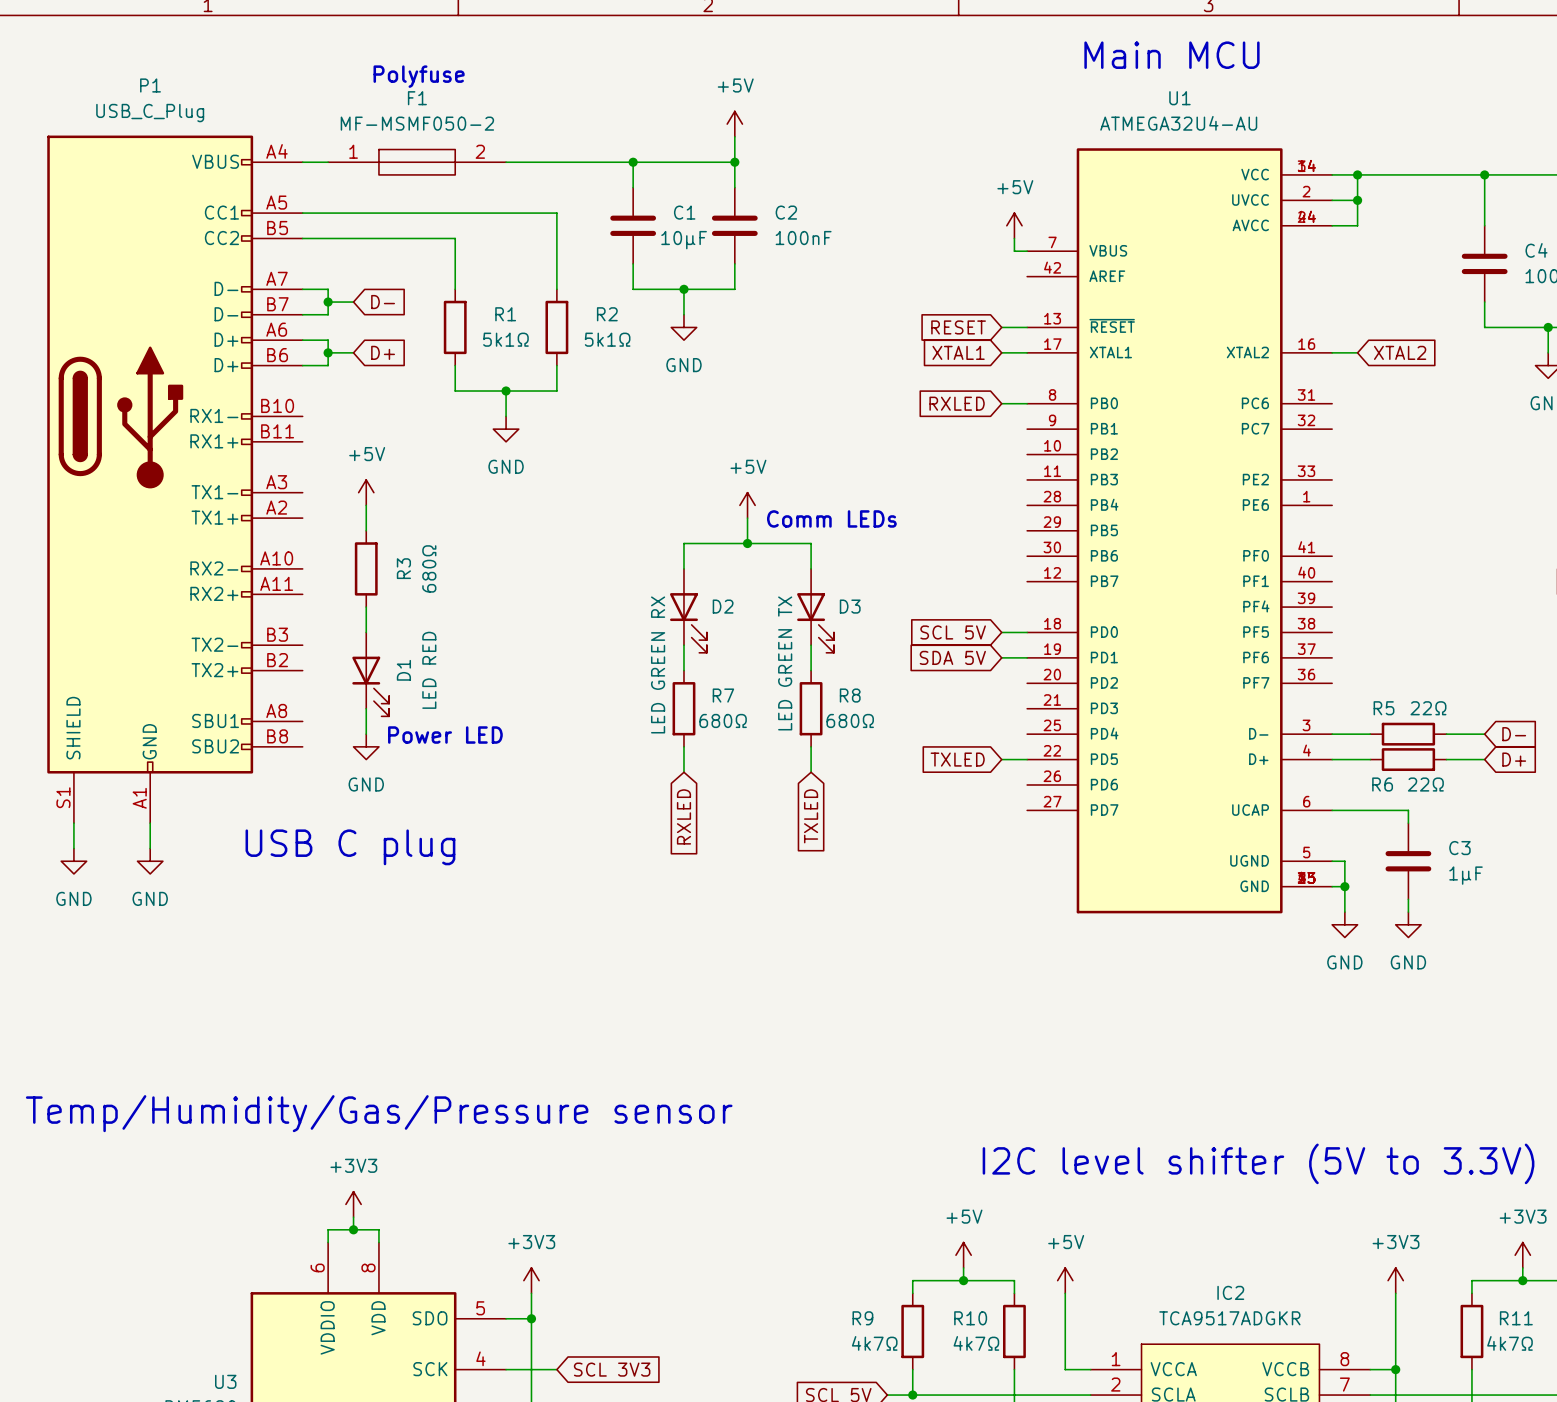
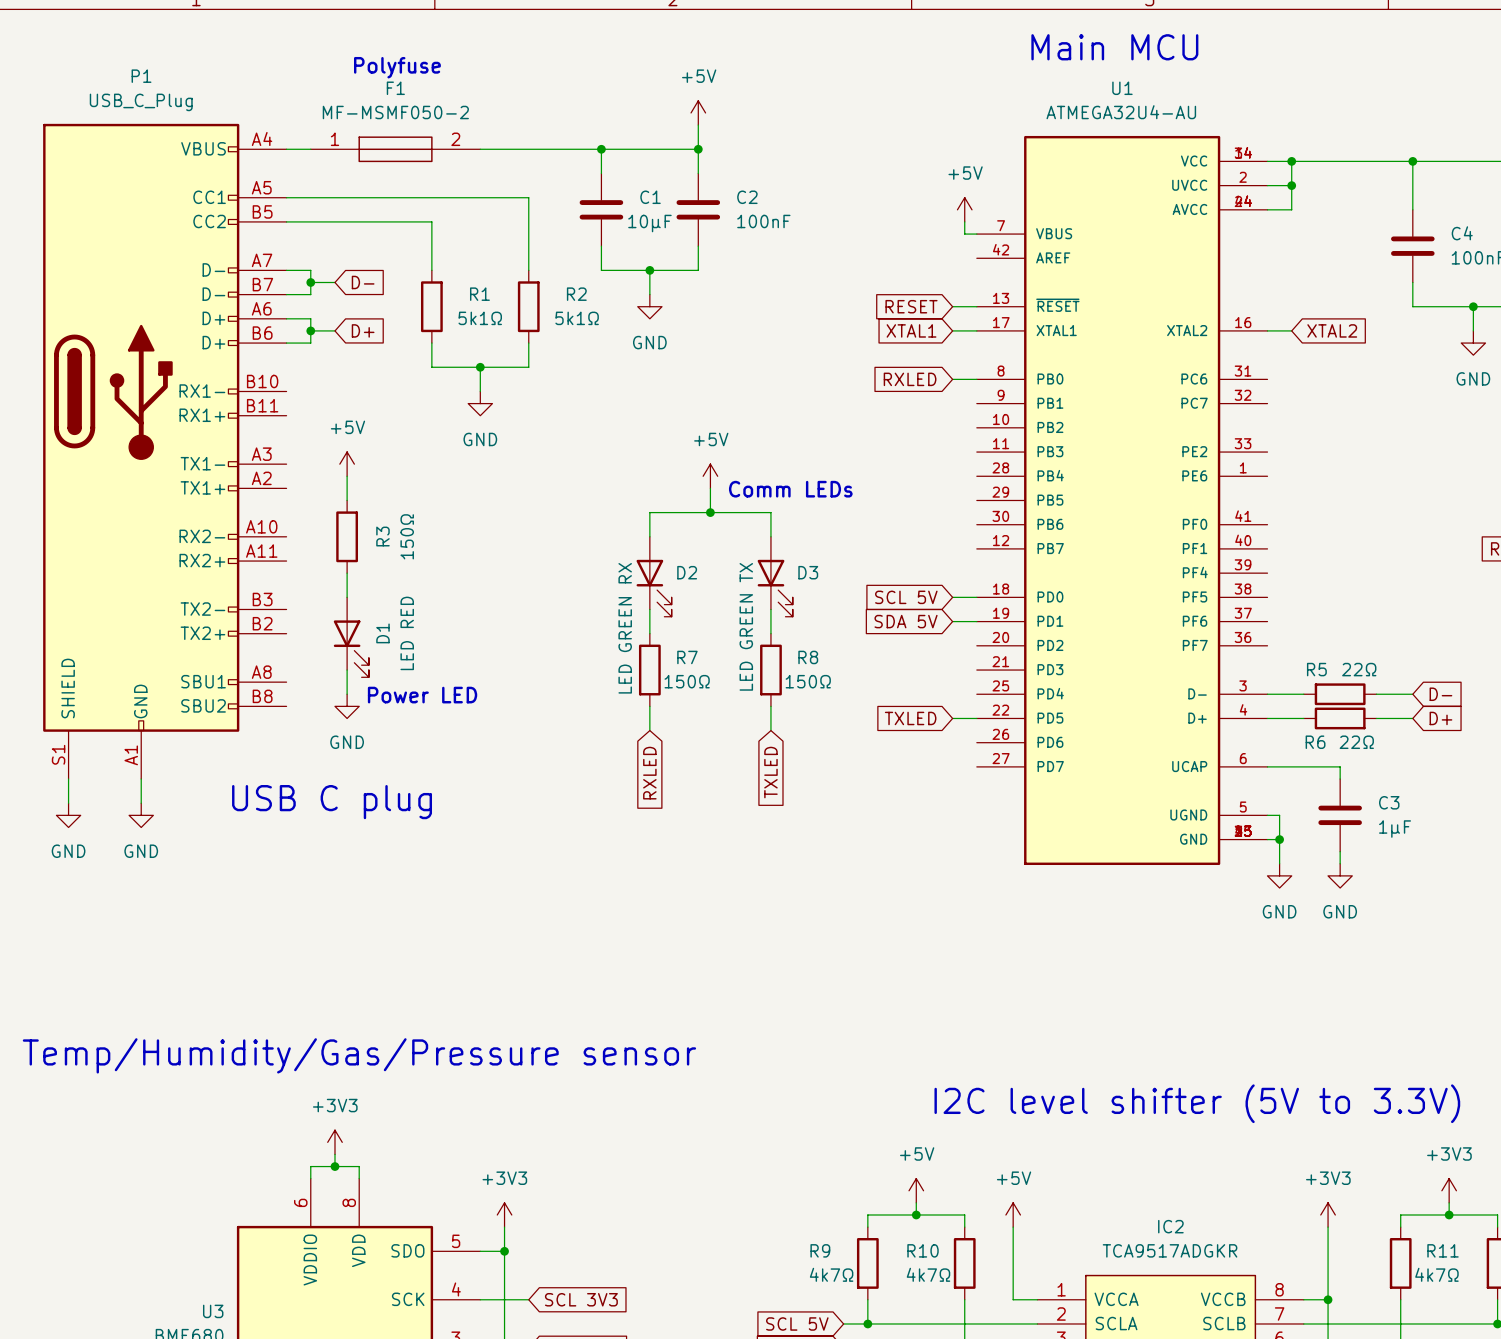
R3 value: 680Ω (429, 568) -> 150Ω (407, 536)
R7 value: 680Ω (723, 720) -> 150Ω (687, 681)
R8 value: 680Ω (850, 720) -> 150Ω (808, 681)

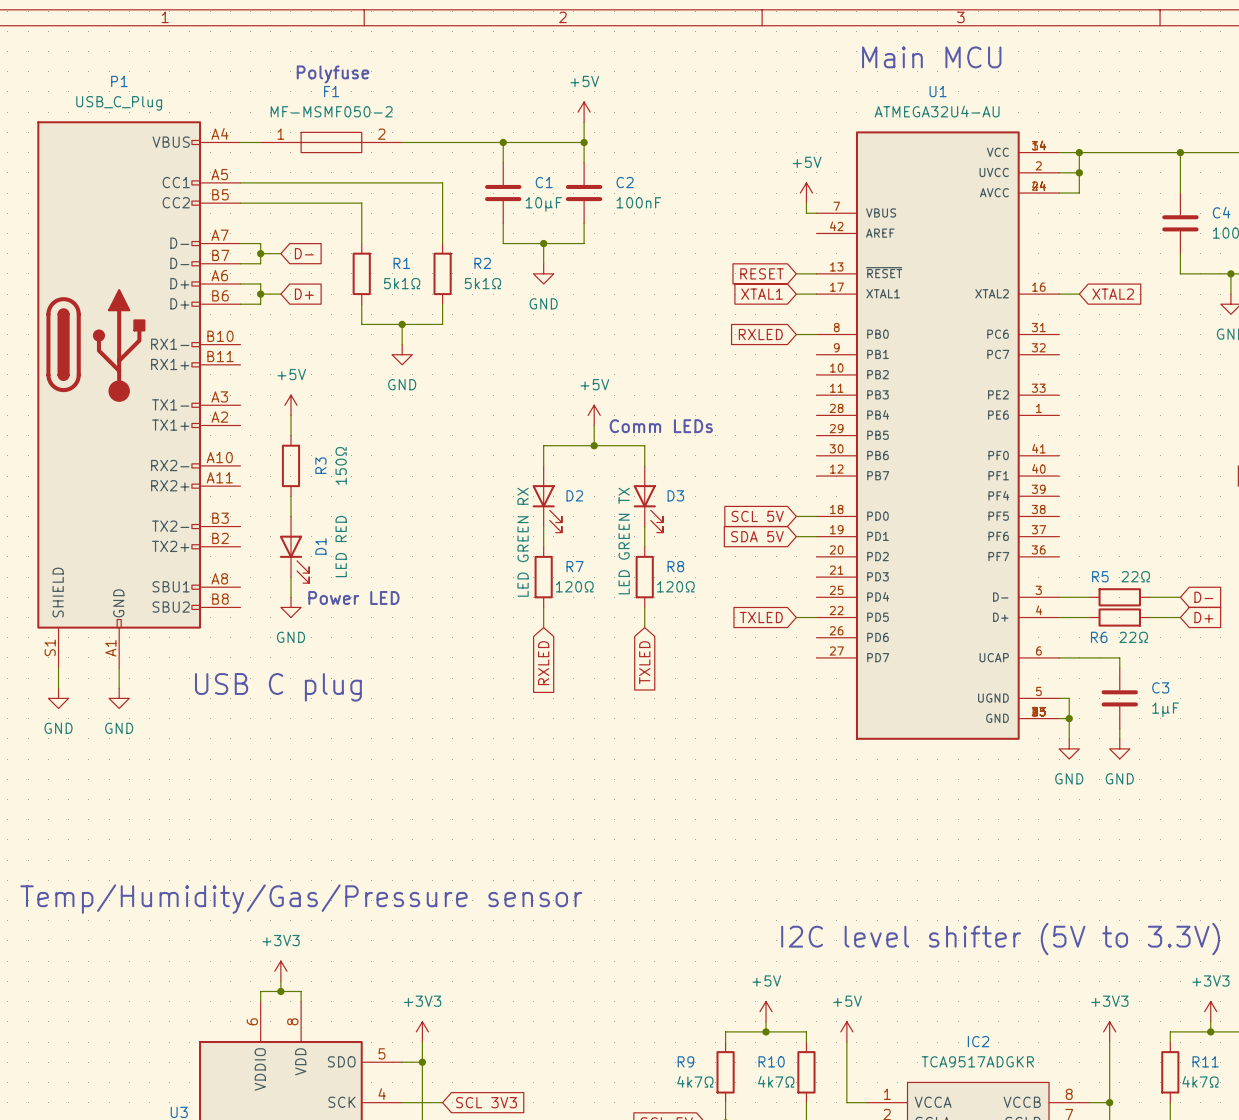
R7 value: 150Ω (687, 681) -> 120Ω (574, 586)
R8 value: 150Ω (808, 681) -> 120Ω (675, 586)

